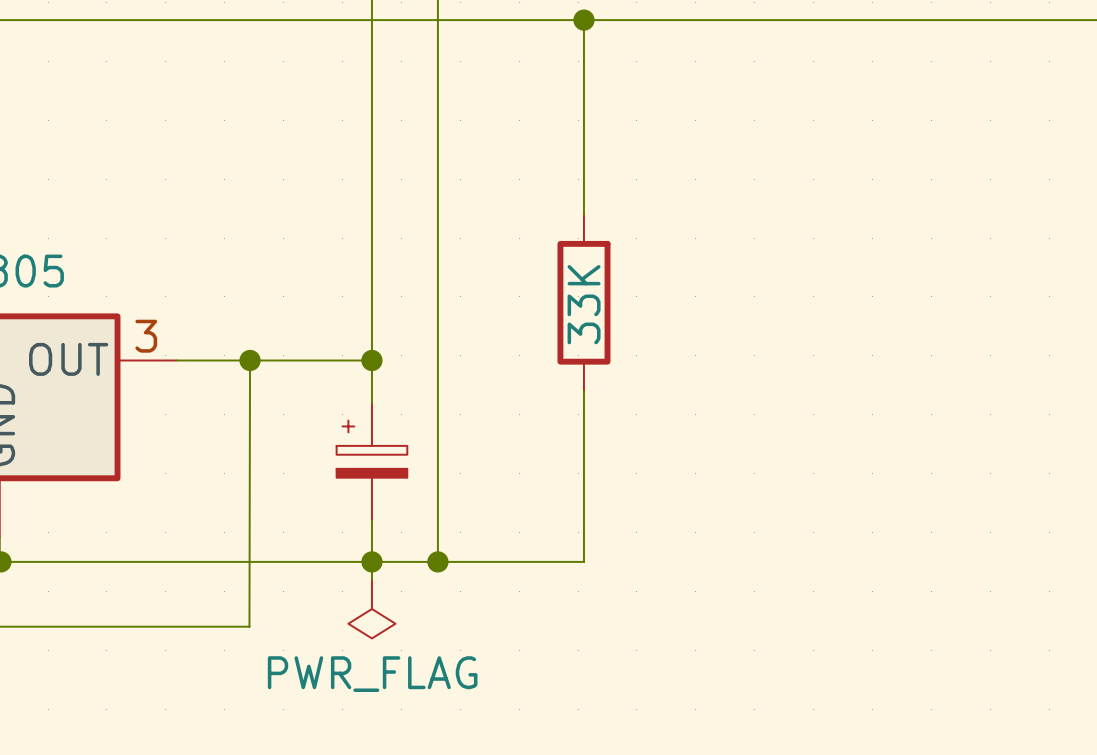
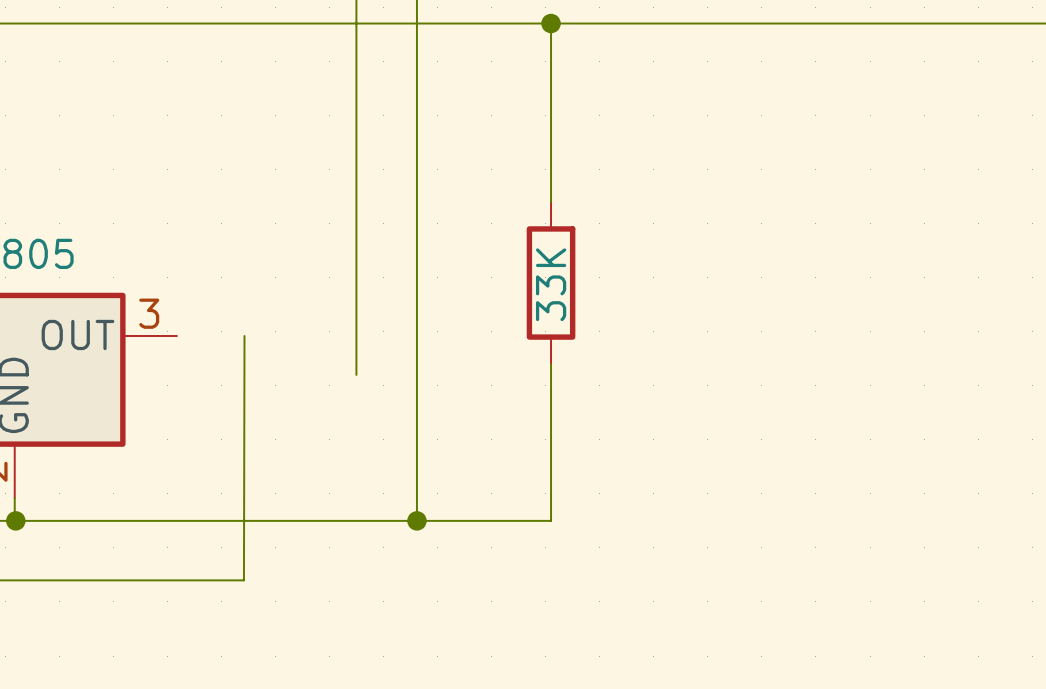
wire: (176, 360) (371, 360) -> none
junction: (250, 360) -> none
junction: (371, 360) -> none
part: (371, 461) -> none
wire: (371, 520) (371, 579) -> none
junction: (371, 561) -> none
power symbol: PWR_FLAG (371, 609) -> none

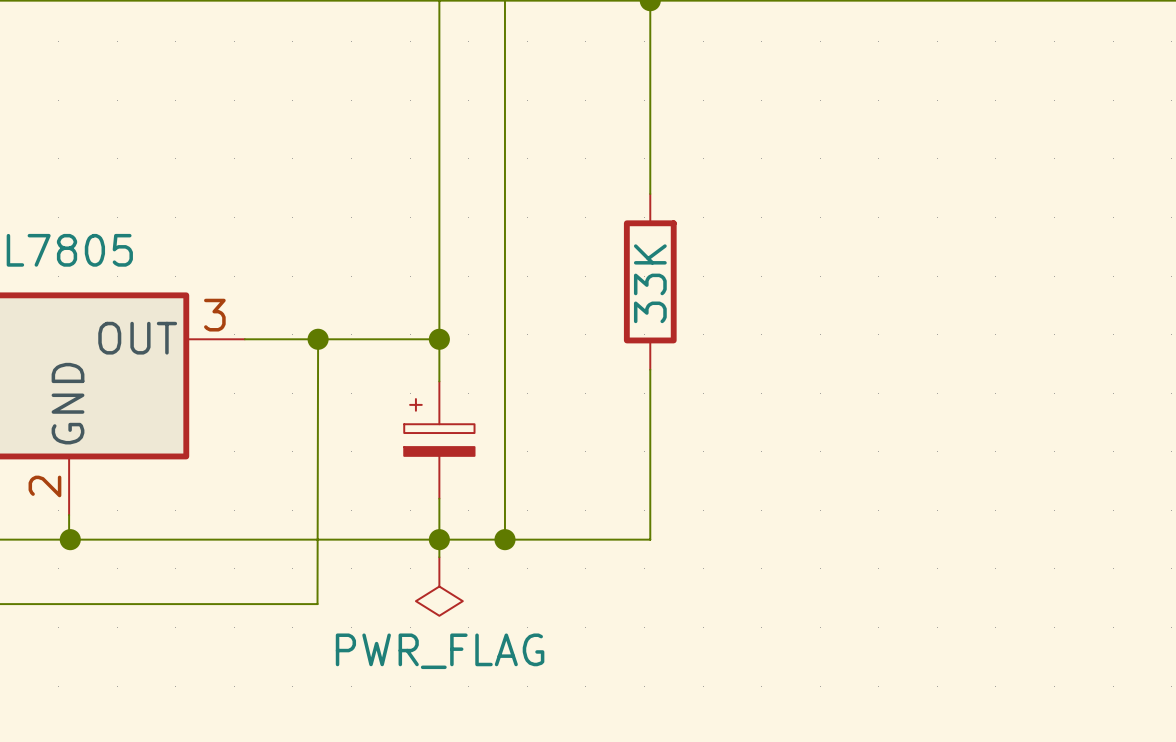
wire: none -> (244, 339) (439, 339)
junction: none -> (318, 339)
junction: none -> (439, 339)
part: none -> (439, 440)
wire: none -> (439, 498) (439, 557)
junction: none -> (439, 539)
power symbol: none -> PWR_FLAG (439, 586)

